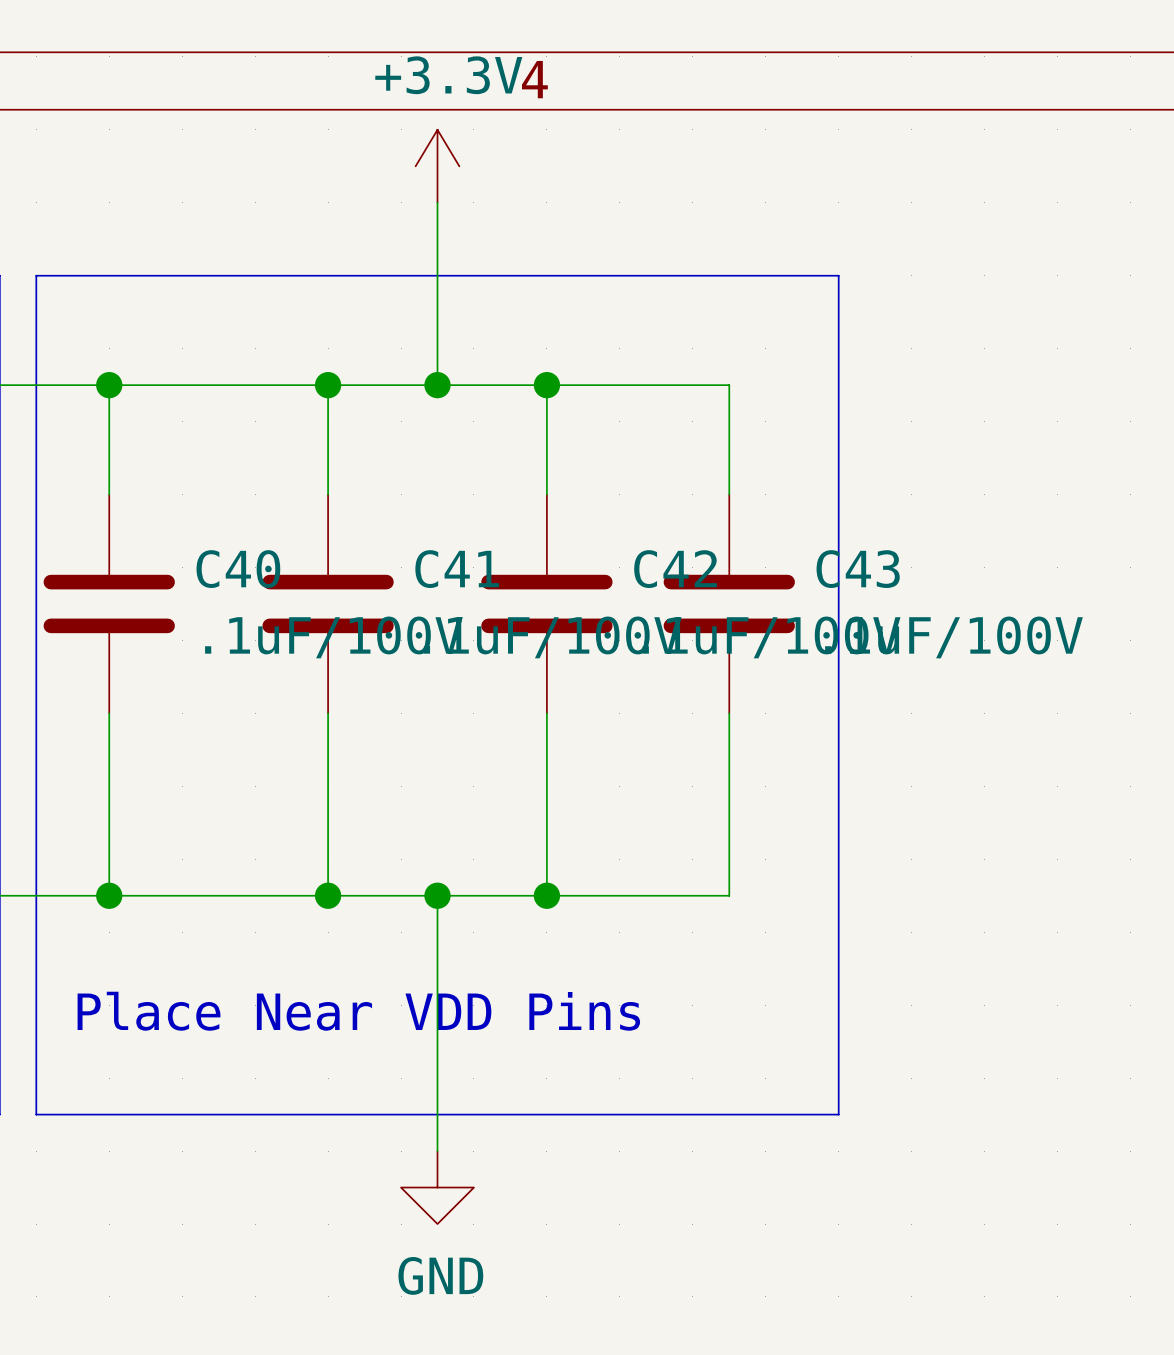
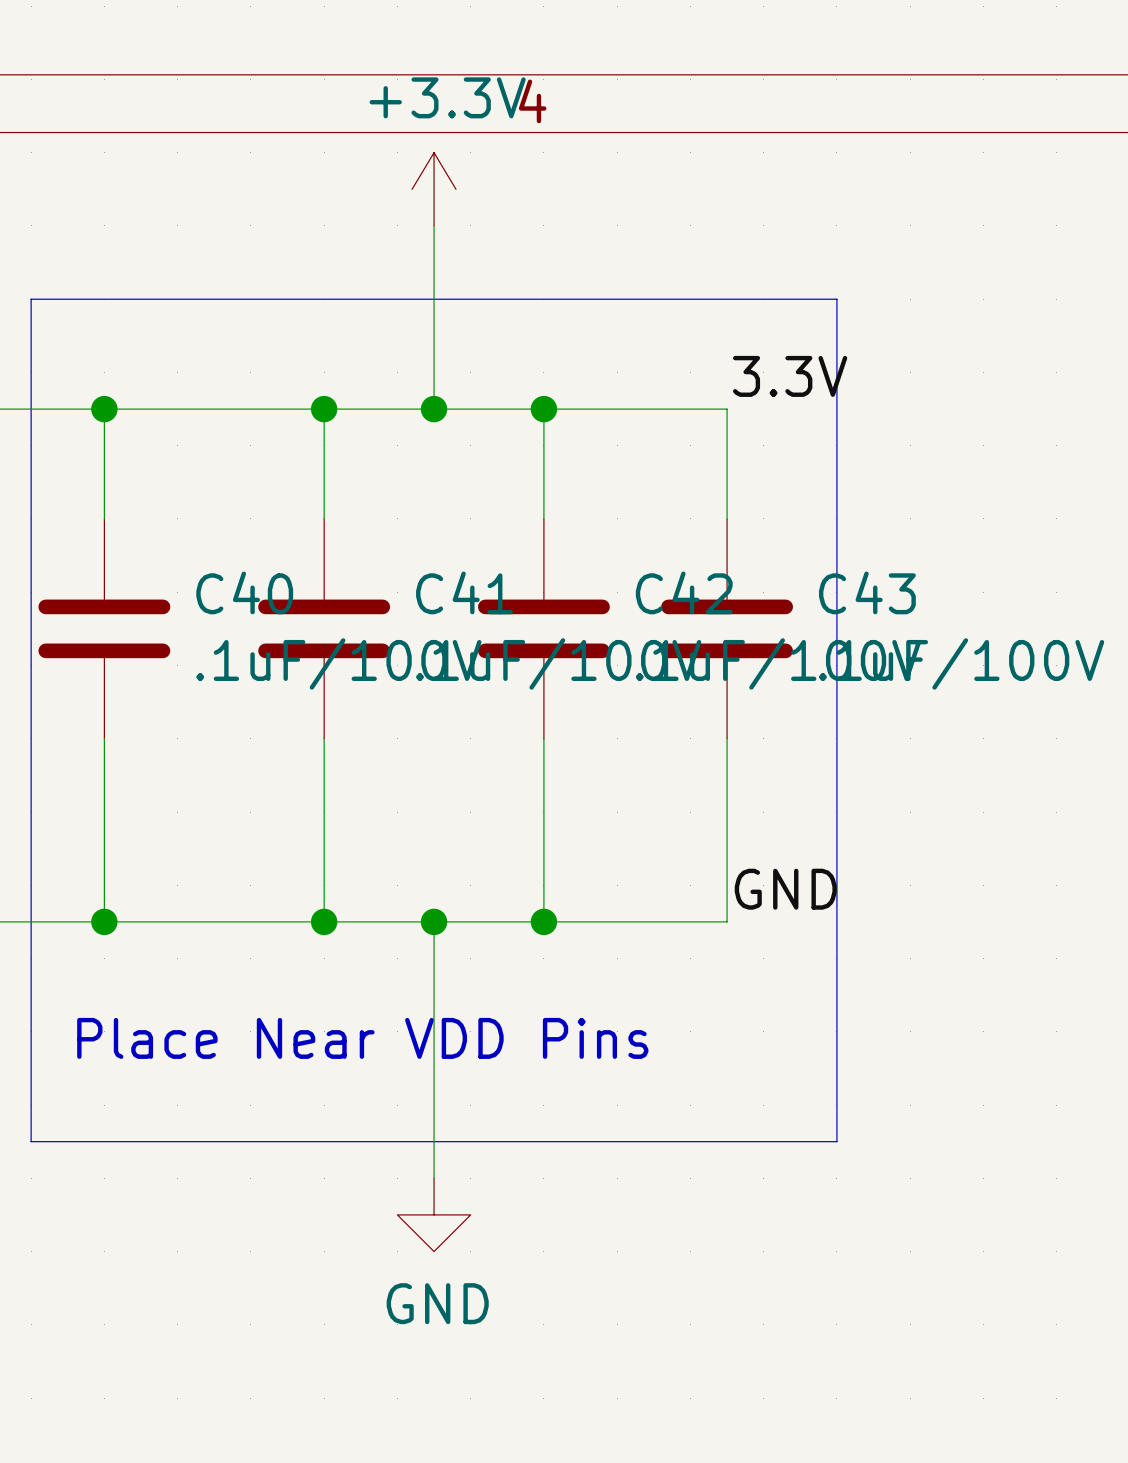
label: none -> 3.3V (790, 376)
label: none -> GND (785, 889)

